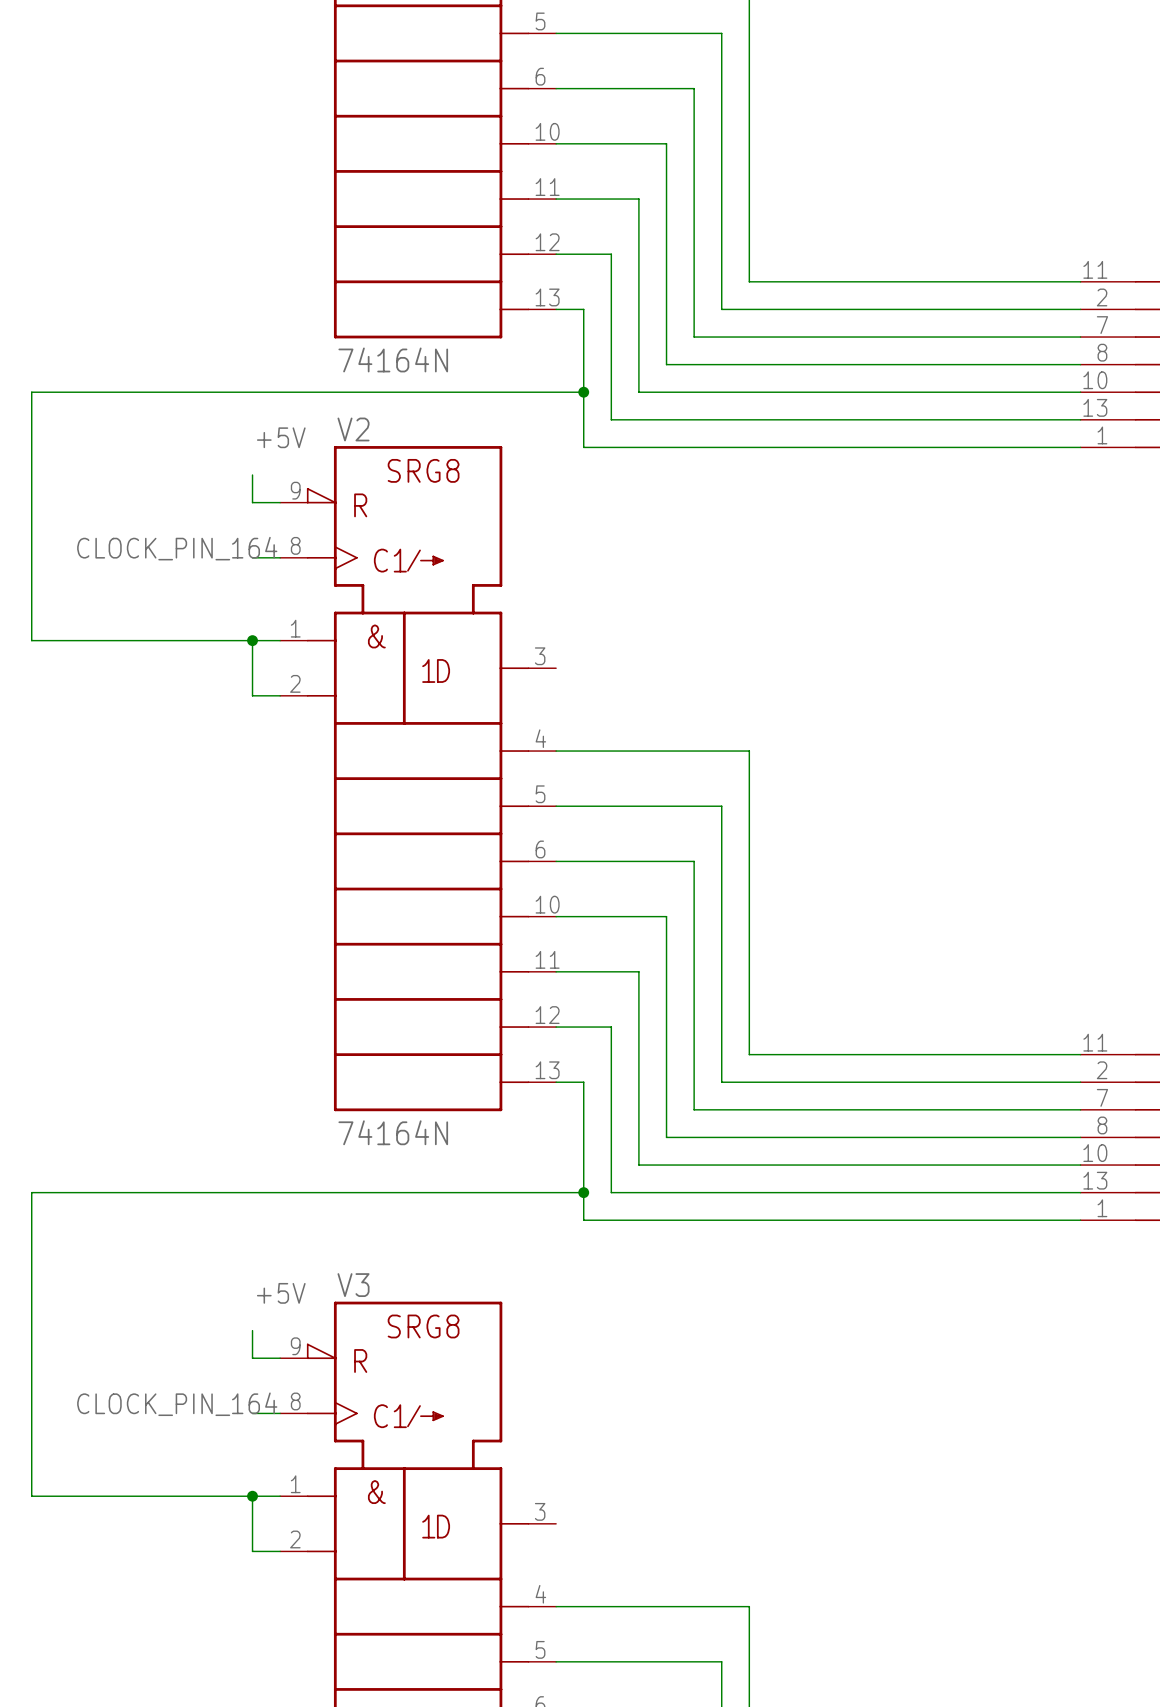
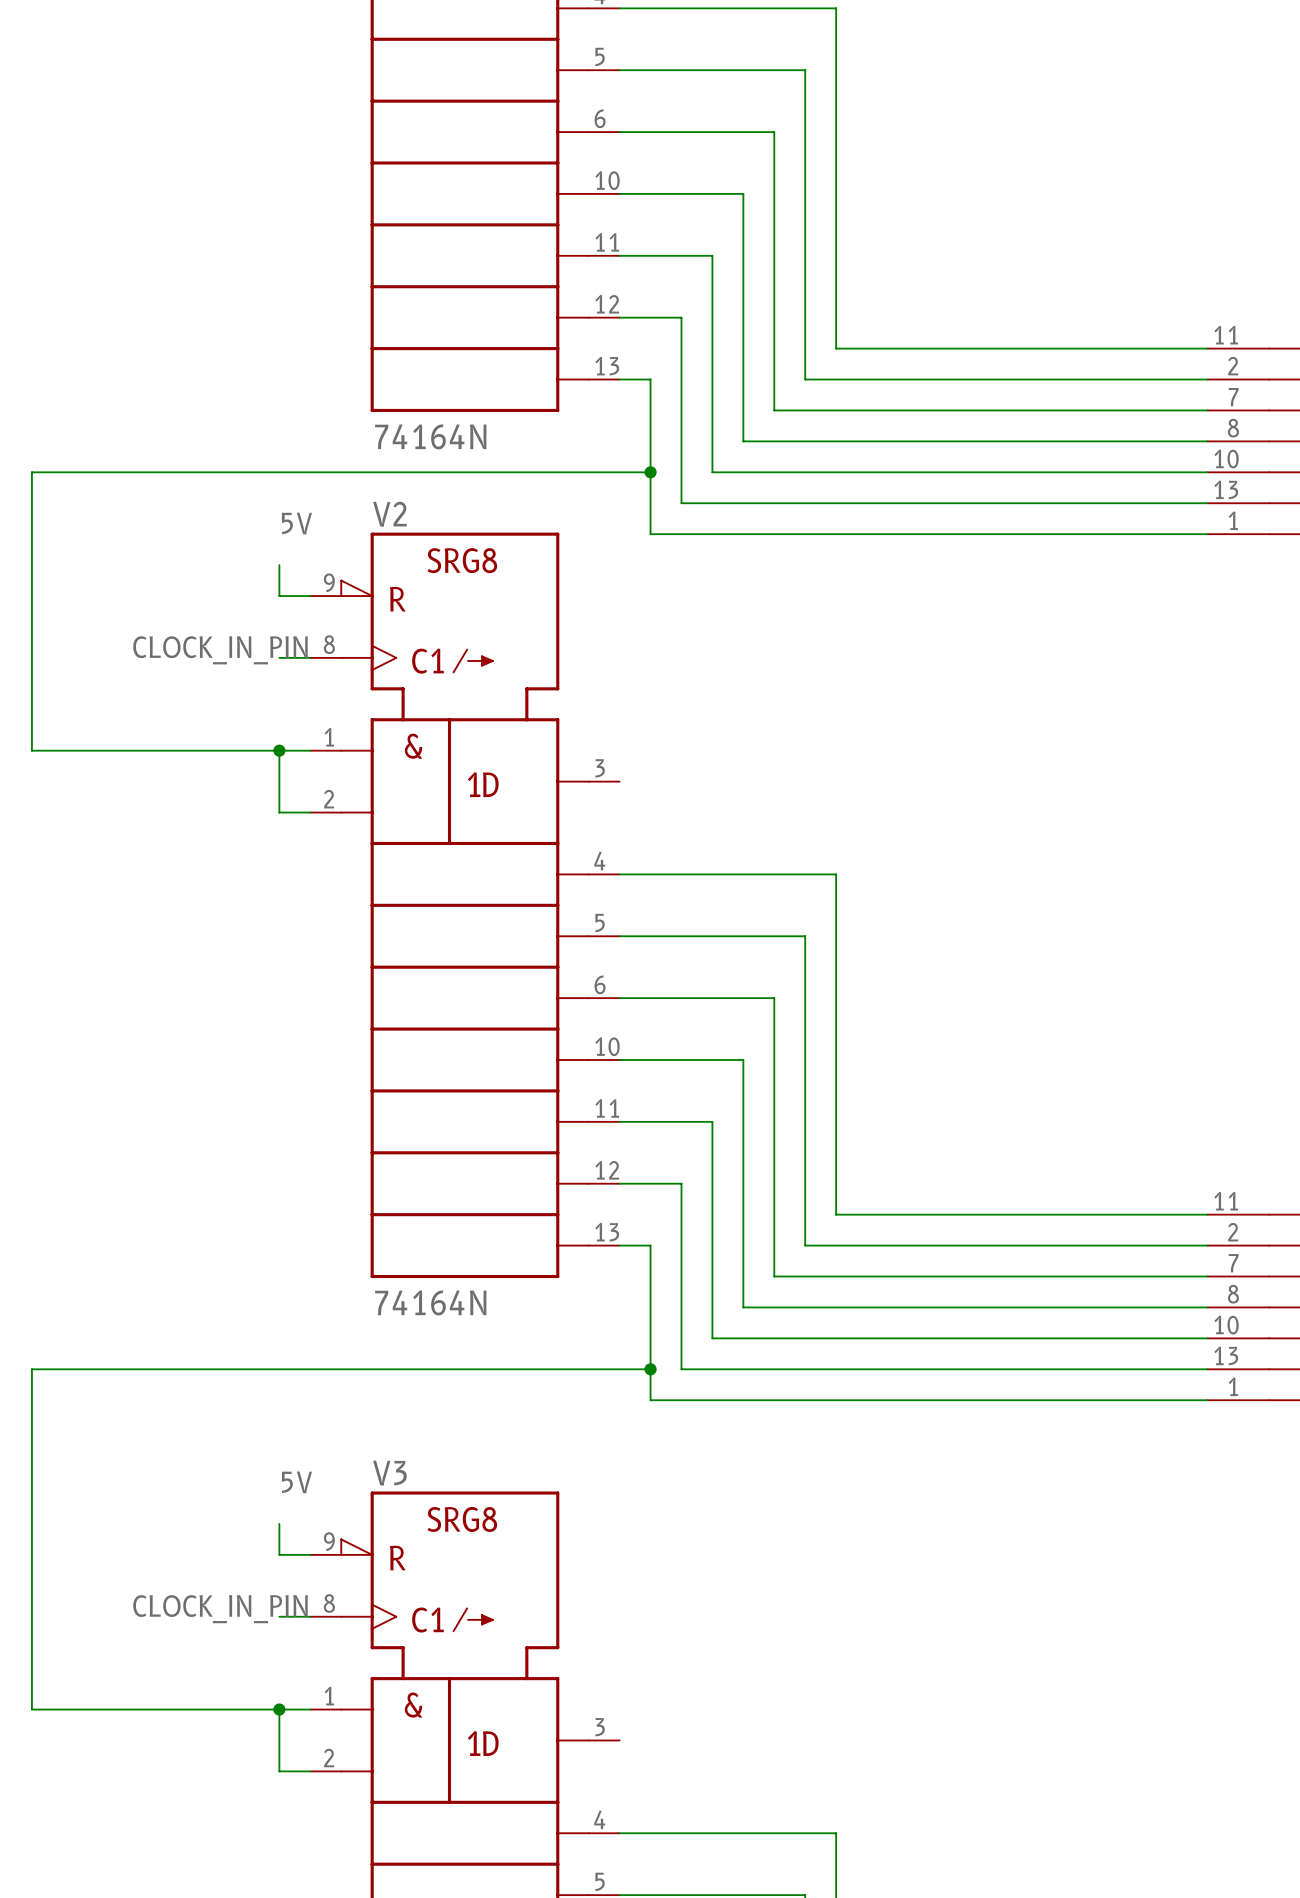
label: +5V (281, 437) -> 5V (296, 523)
label: CLOCK_PIN_164 (177, 548) -> CLOCK_IN_PIN (220, 650)
label: +5V (281, 1293) -> 5V (296, 1482)
label: CLOCK_PIN_164 (177, 1404) -> CLOCK_IN_PIN (220, 1609)

